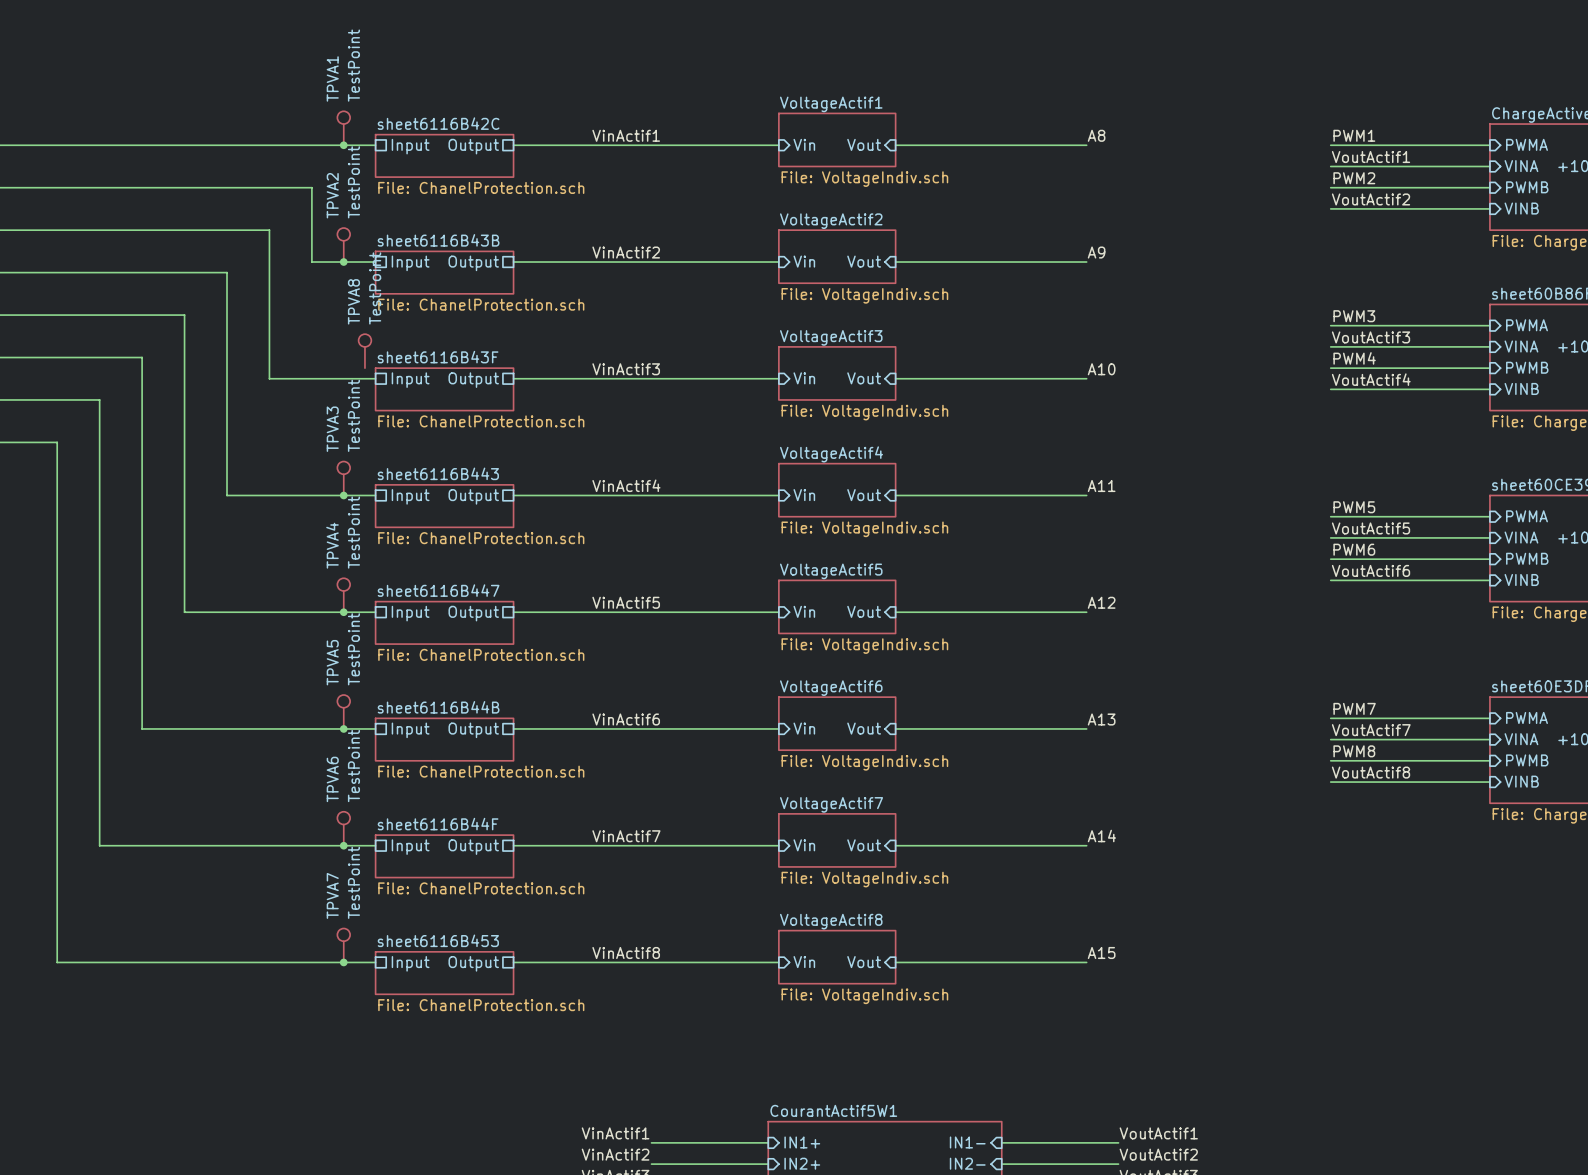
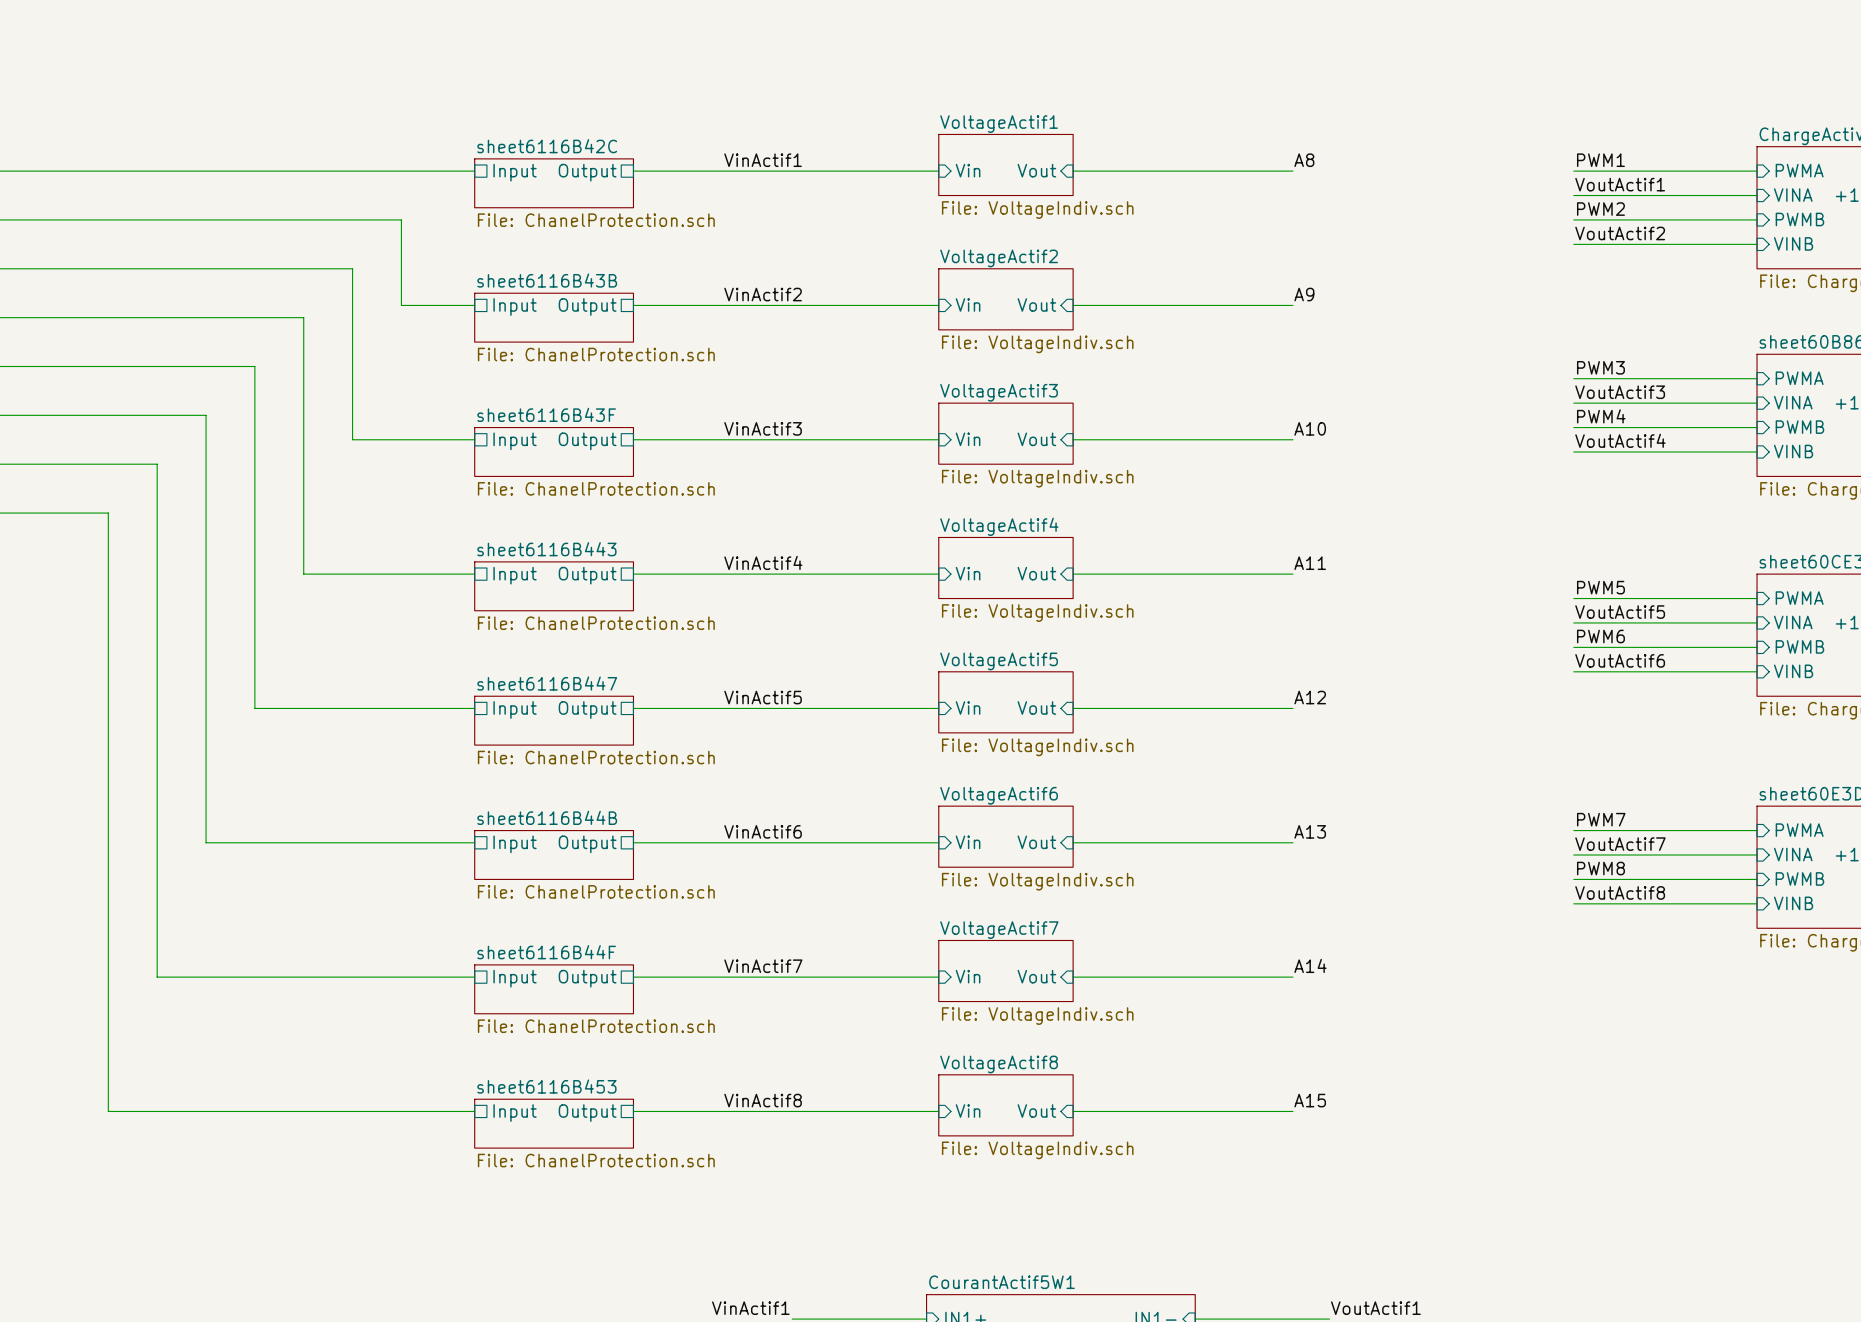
TPVA1: TestPoint (343, 128) -> none
junction: (343, 145) -> none
TPVA2: TestPoint (343, 245) -> none
junction: (343, 262) -> none
TPVA8: TestPoint (364, 351) -> none
TPVA3: TestPoint (343, 478) -> none
junction: (343, 495) -> none
TPVA4: TestPoint (343, 595) -> none
junction: (343, 612) -> none
TPVA5: TestPoint (343, 711) -> none
junction: (343, 728) -> none
TPVA6: TestPoint (343, 828) -> none
junction: (343, 845) -> none
TPVA7: TestPoint (343, 945) -> none
junction: (343, 962) -> none

